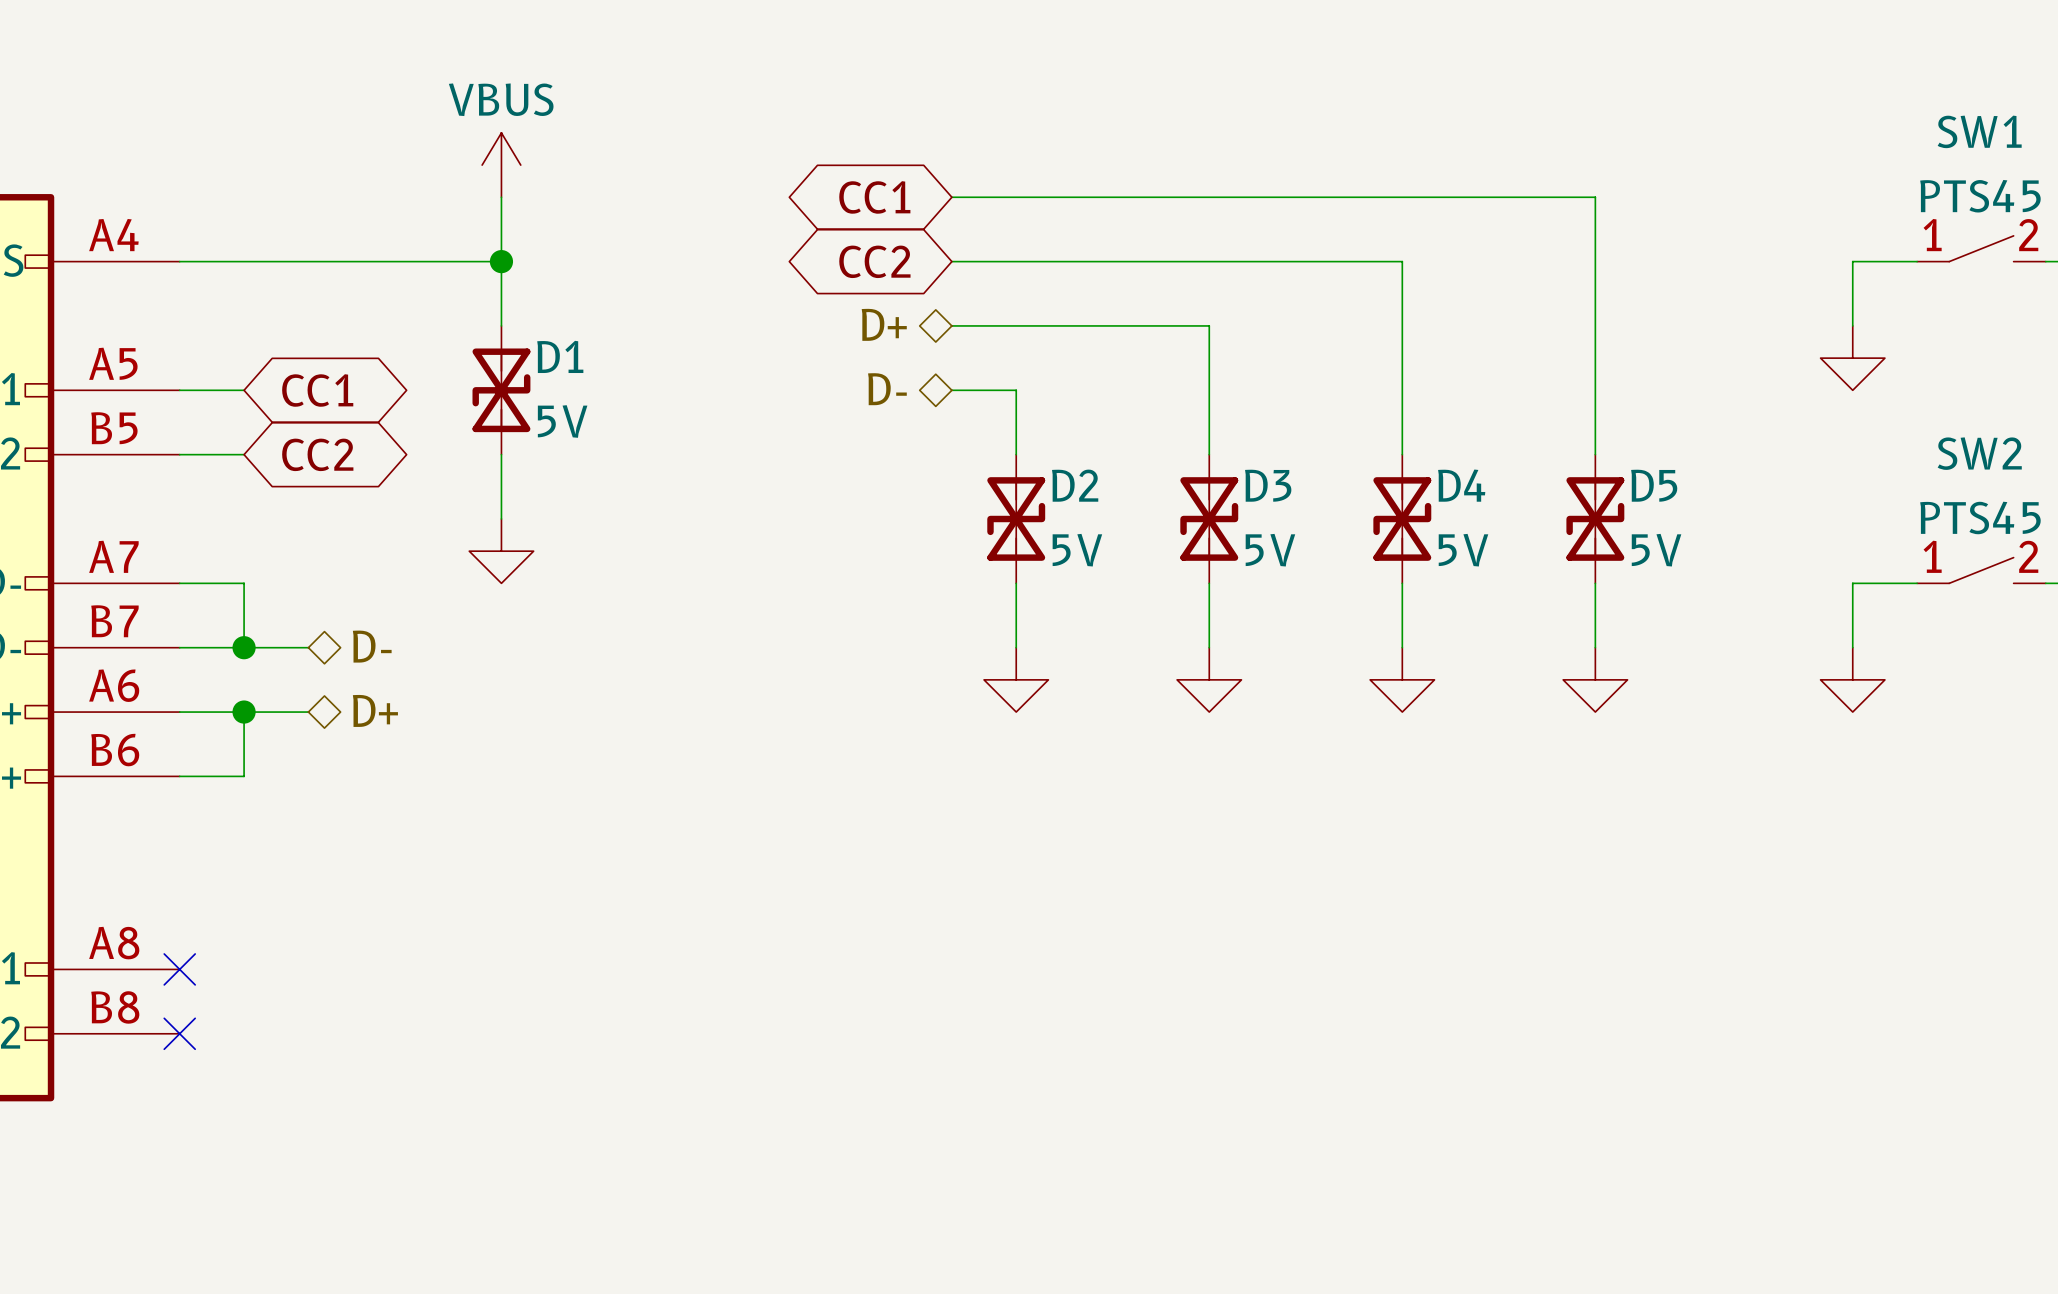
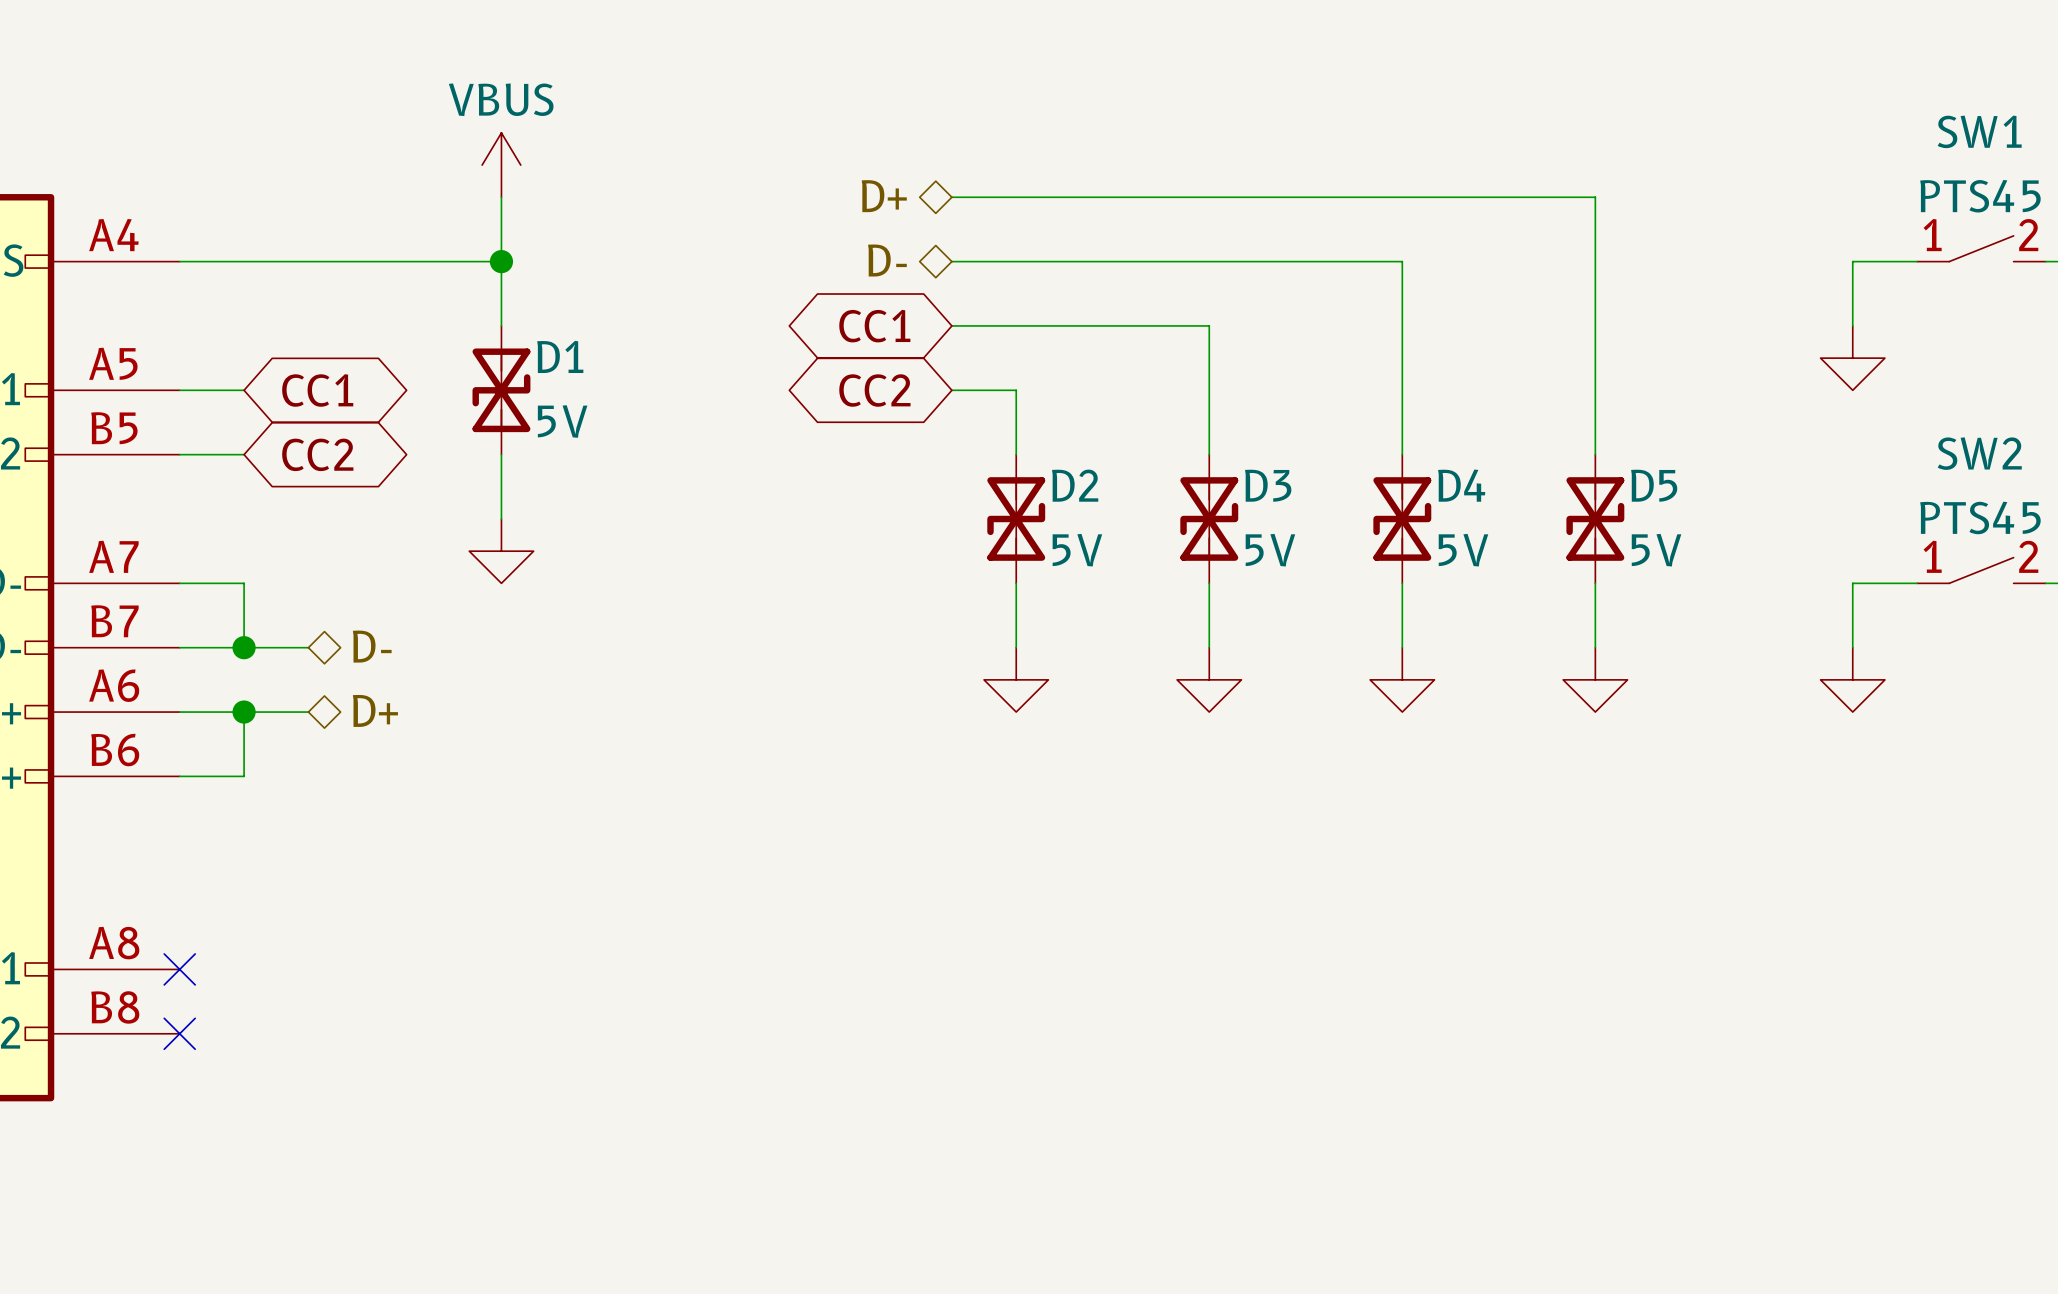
global label position: CC1 (874, 197) -> CC1 (874, 326)
global label position: CC2 (874, 261) -> CC2 (874, 390)
hierarchical label position: D+ (884, 324) -> D+ (884, 196)
hierarchical label position: D- (887, 389) -> D- (887, 260)

